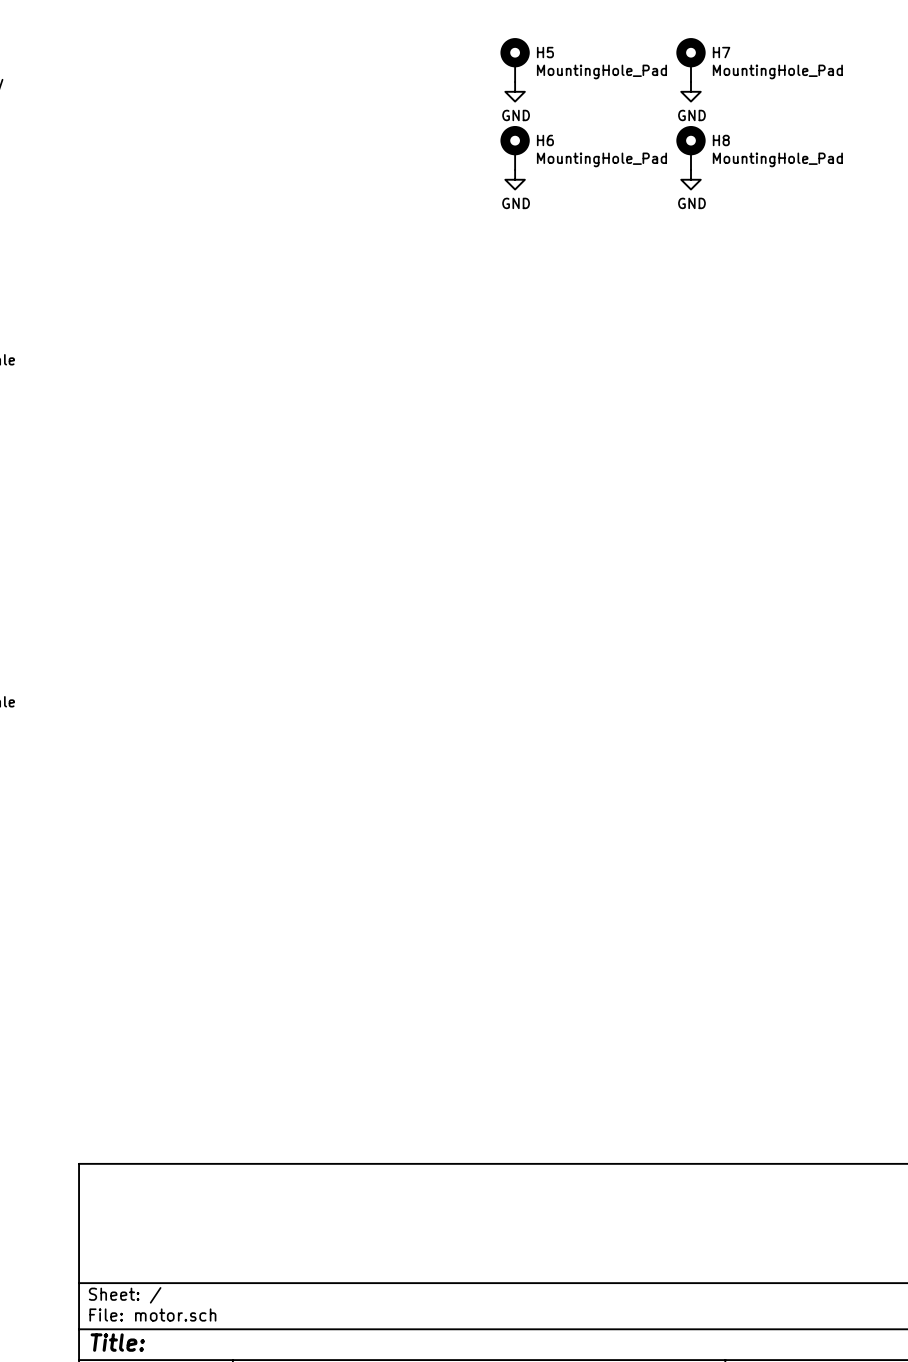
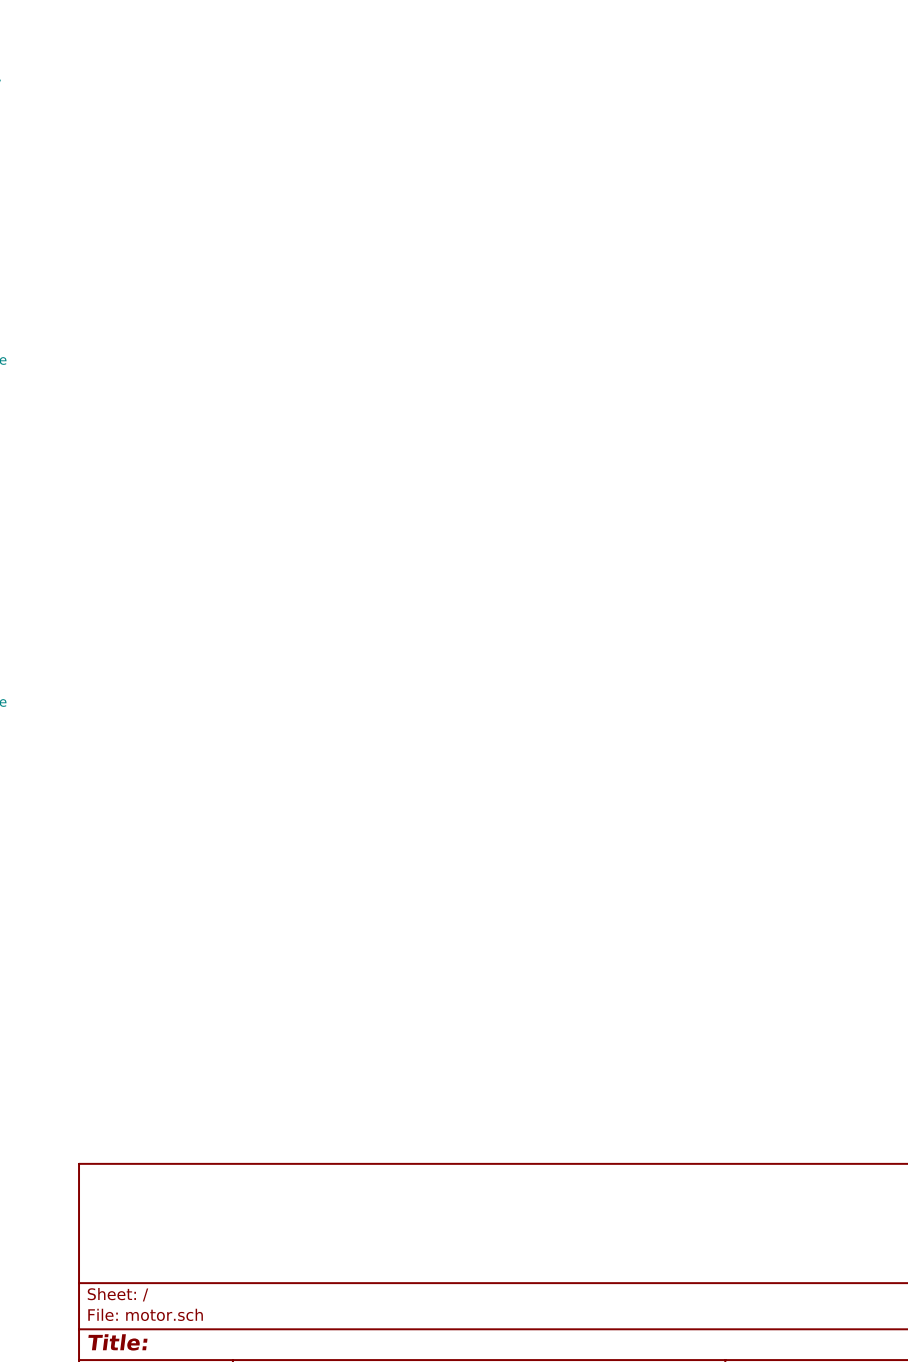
H5: MountingHole_Pad (515, 60) -> none
H7: MountingHole_Pad (690, 60) -> none
power symbol: GND (515, 91) -> none
power symbol: GND (690, 91) -> none
H6: MountingHole_Pad (515, 147) -> none
H8: MountingHole_Pad (690, 147) -> none
power symbol: GND (515, 179) -> none
power symbol: GND (690, 179) -> none

